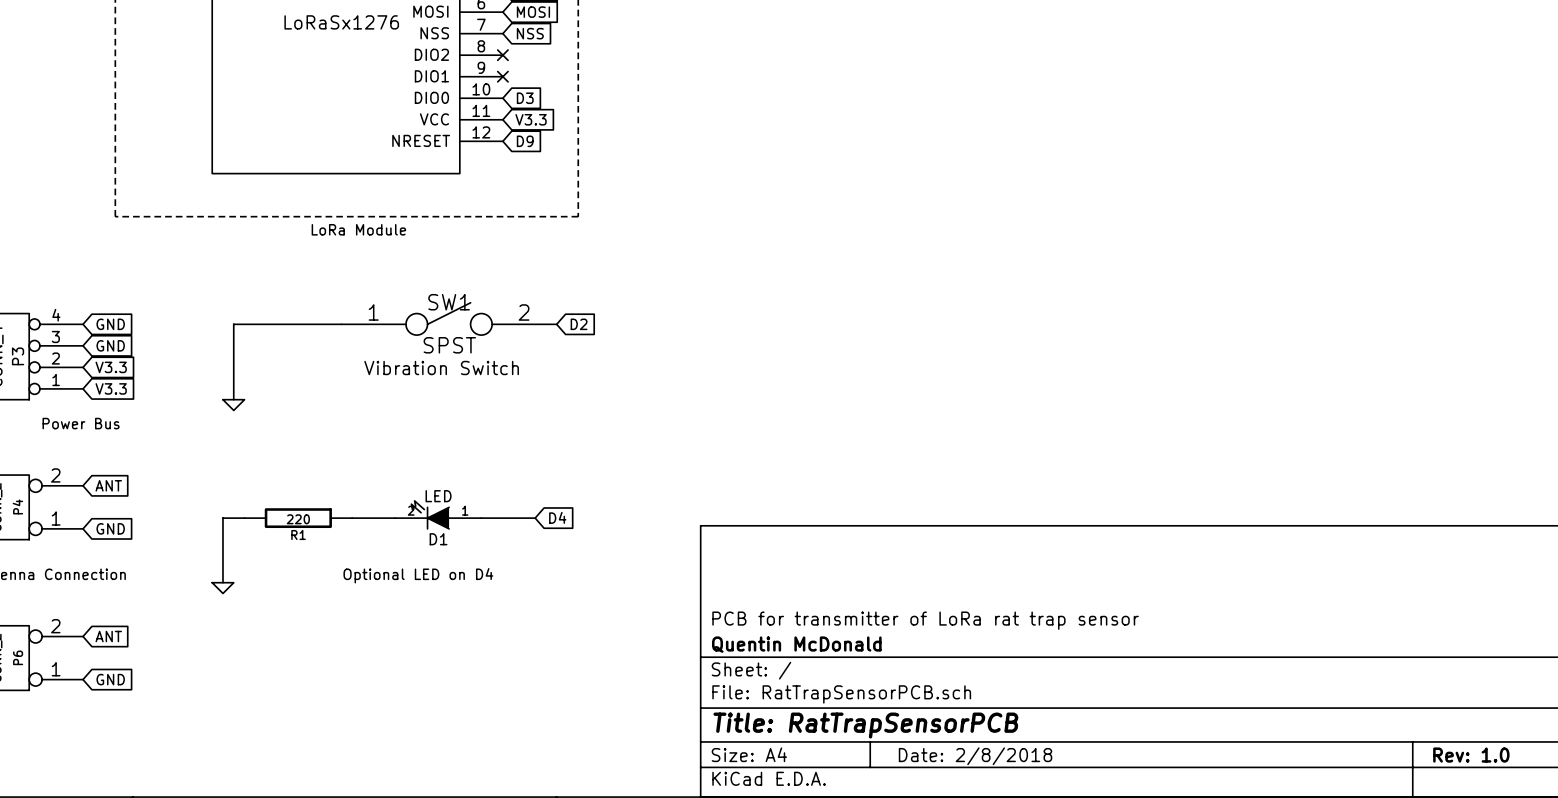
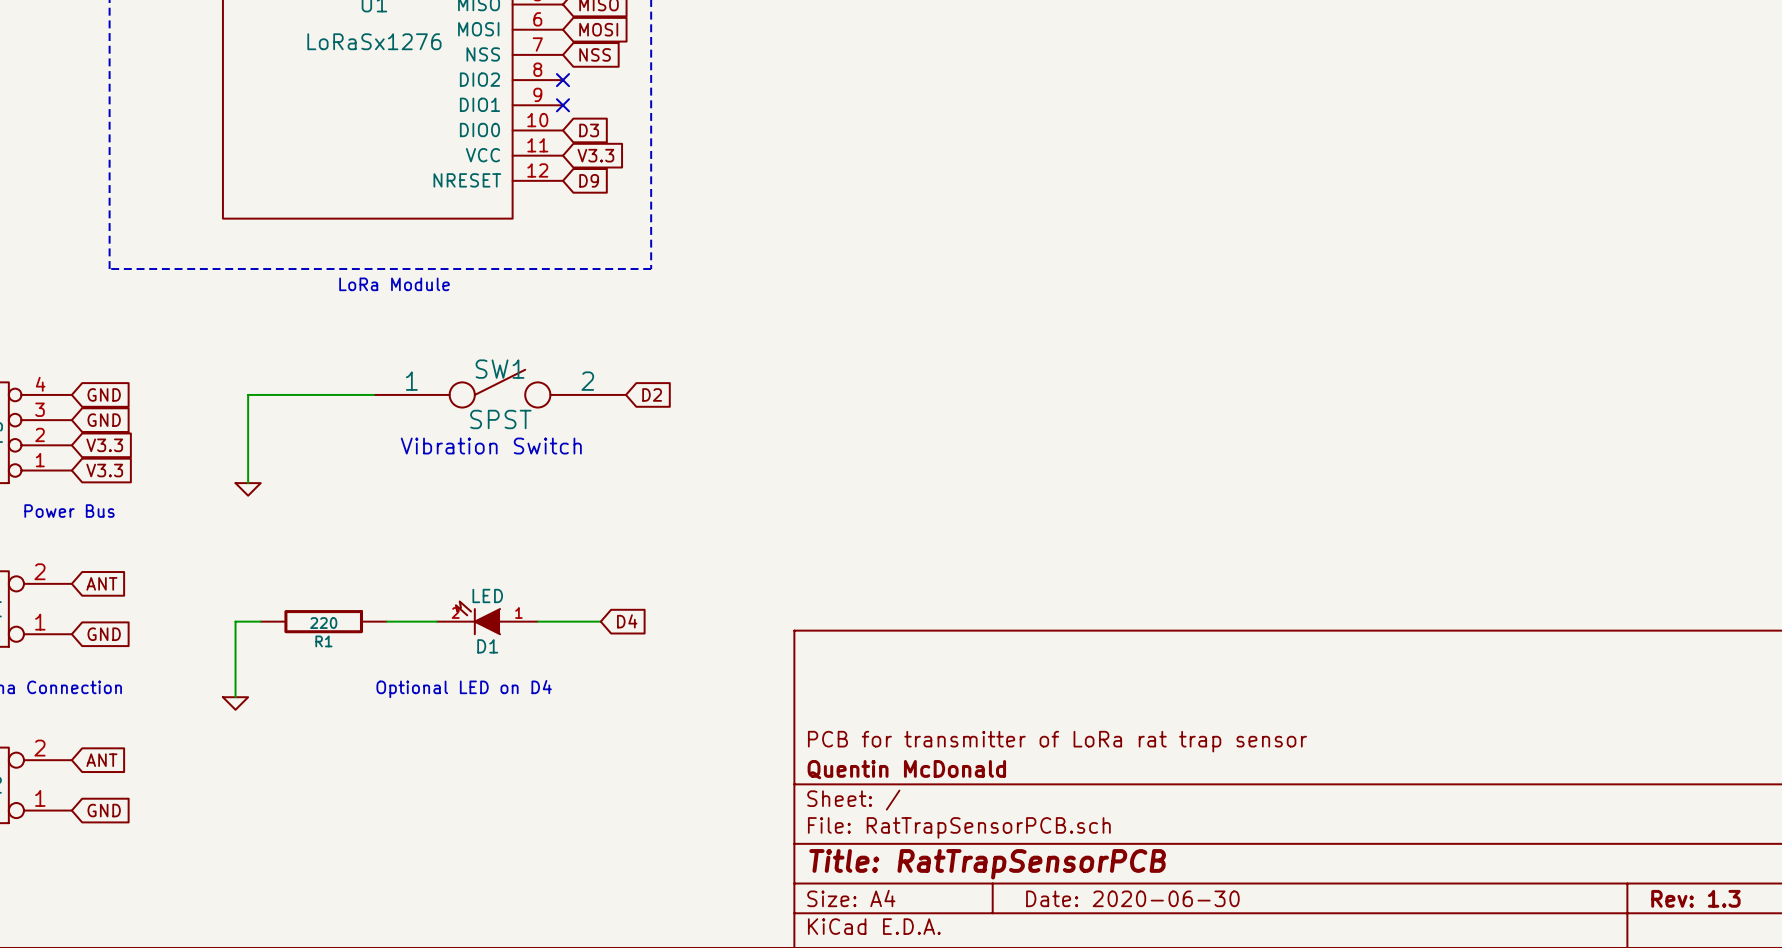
title block: Rev: 1.0 (1471, 755) -> Rev: 1.3 (1695, 898)
title block: Date: 2/8/2018 (975, 756) -> Date: 2020-06-30 (1132, 898)

